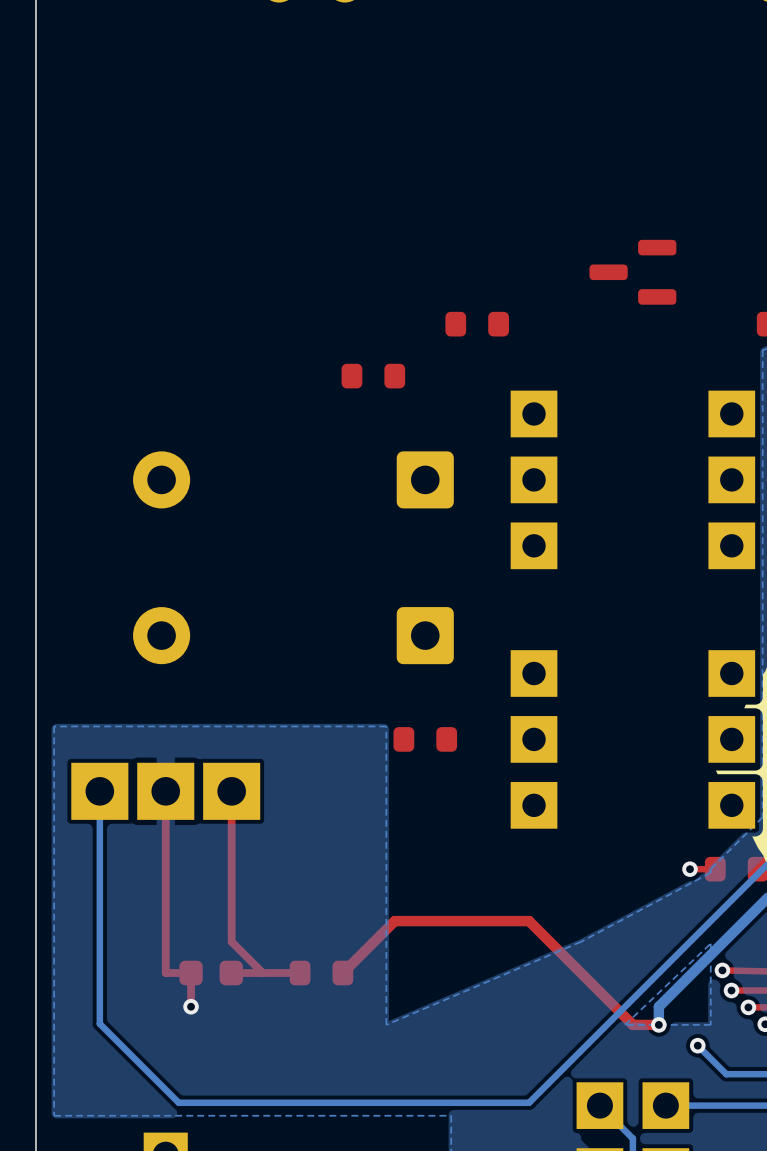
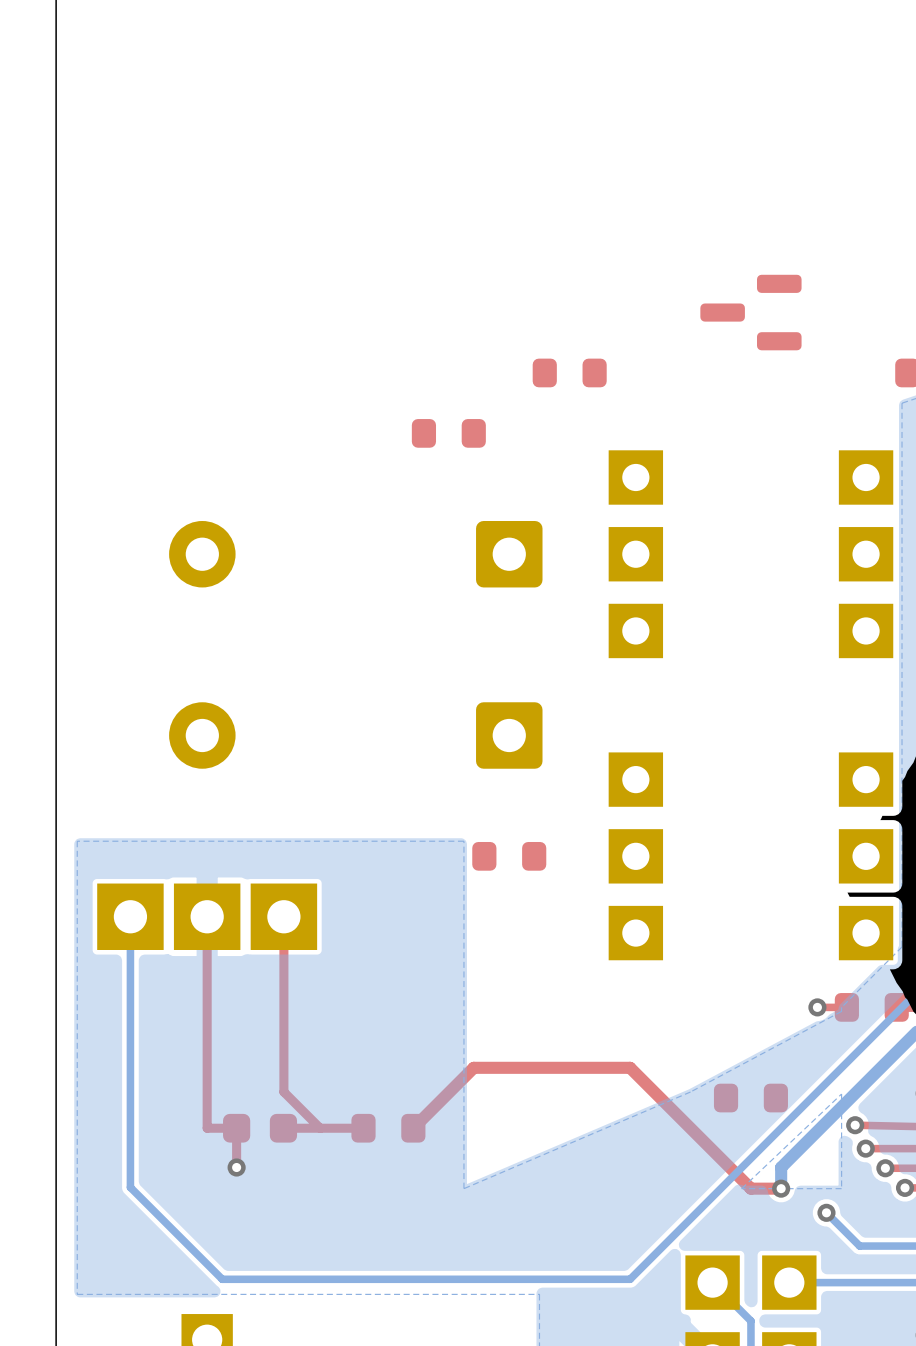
part: none -> (750, 1098)

